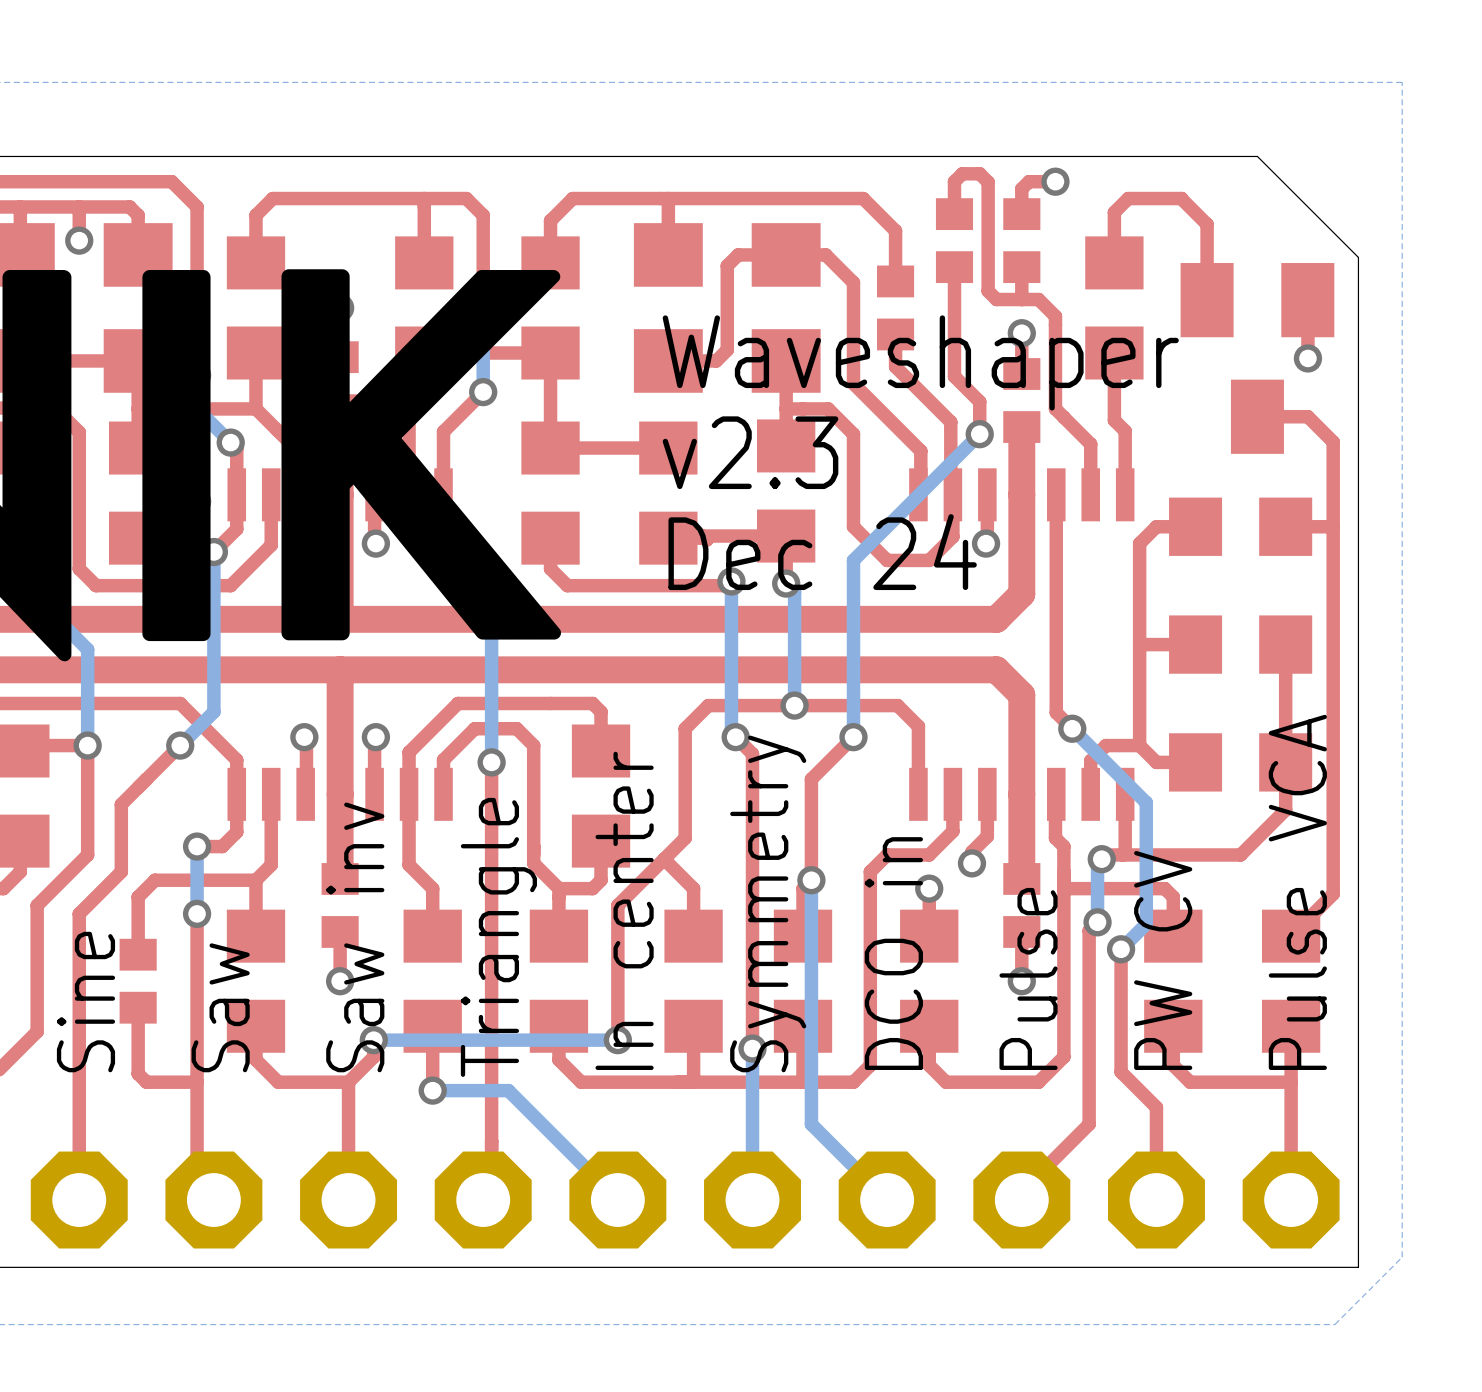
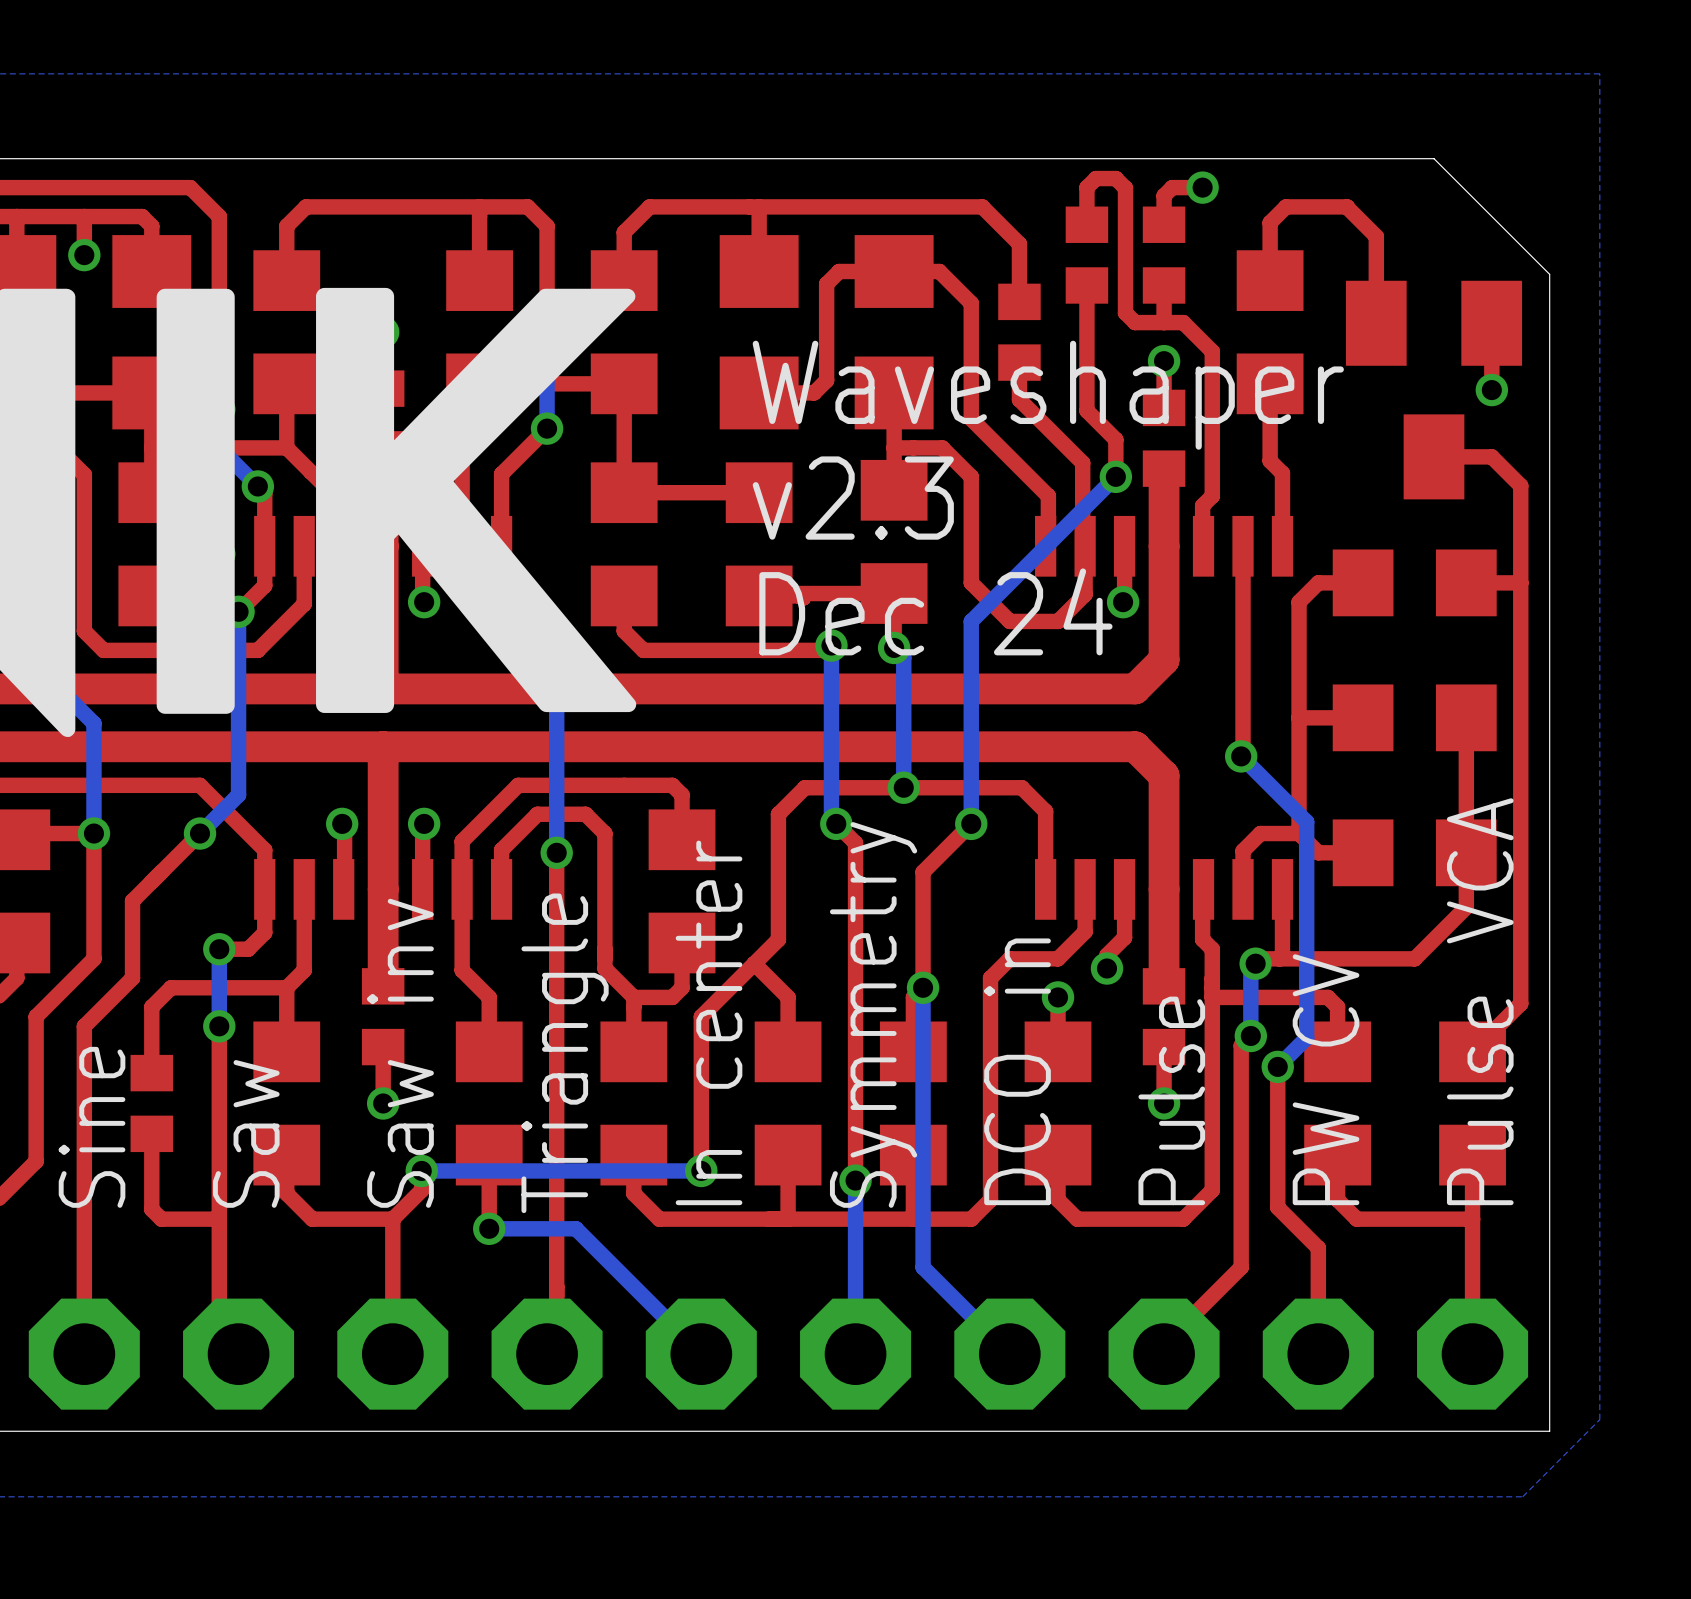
top track: (1055, 316) (1055, 408) (1090, 444) (1090, 494) -> (1202, 341) (1212, 351) (1212, 496) (1202, 505) (1203, 546)
top track: (1056, 494) (1056, 712) (1072, 728) -> none
top track: none -> (1243, 546) (1243, 756) (1241, 756)
bottom track: (1072, 728) (1146, 802) -> (1241, 756) (1306, 821) (1306, 899)
via position: (1072, 728) -> (1241, 756)

